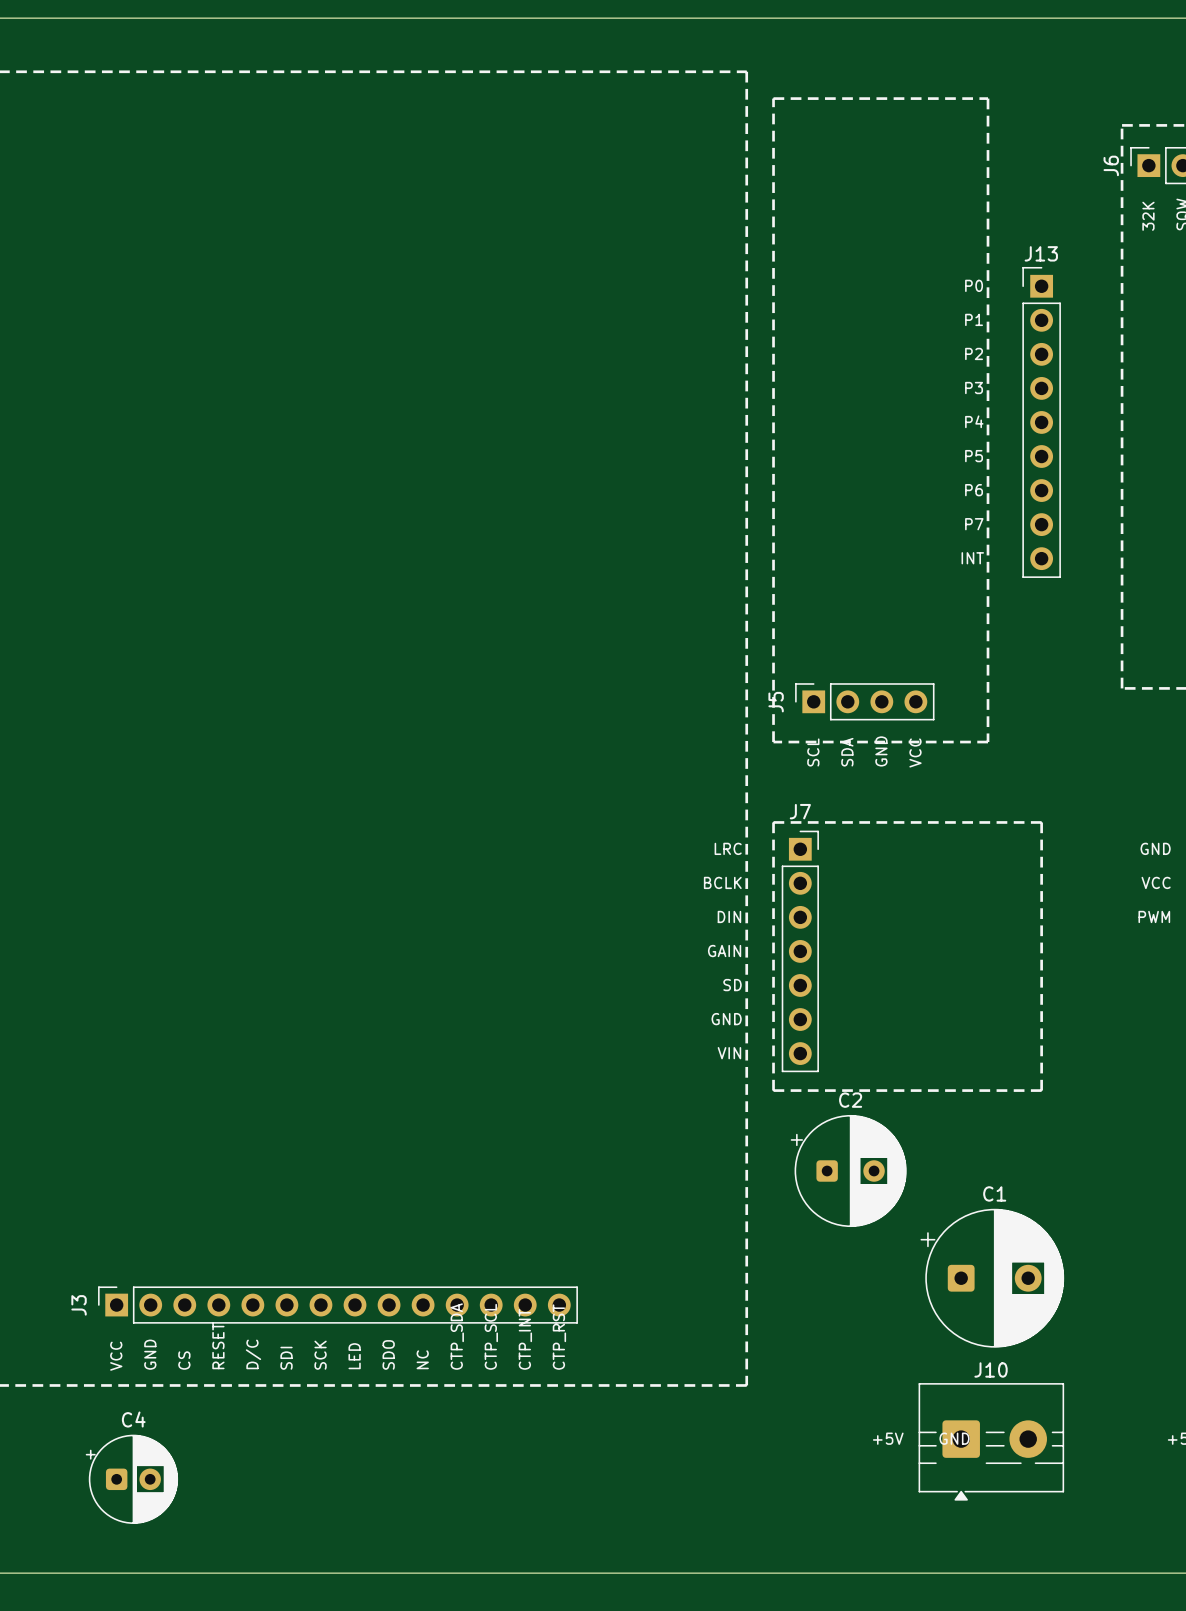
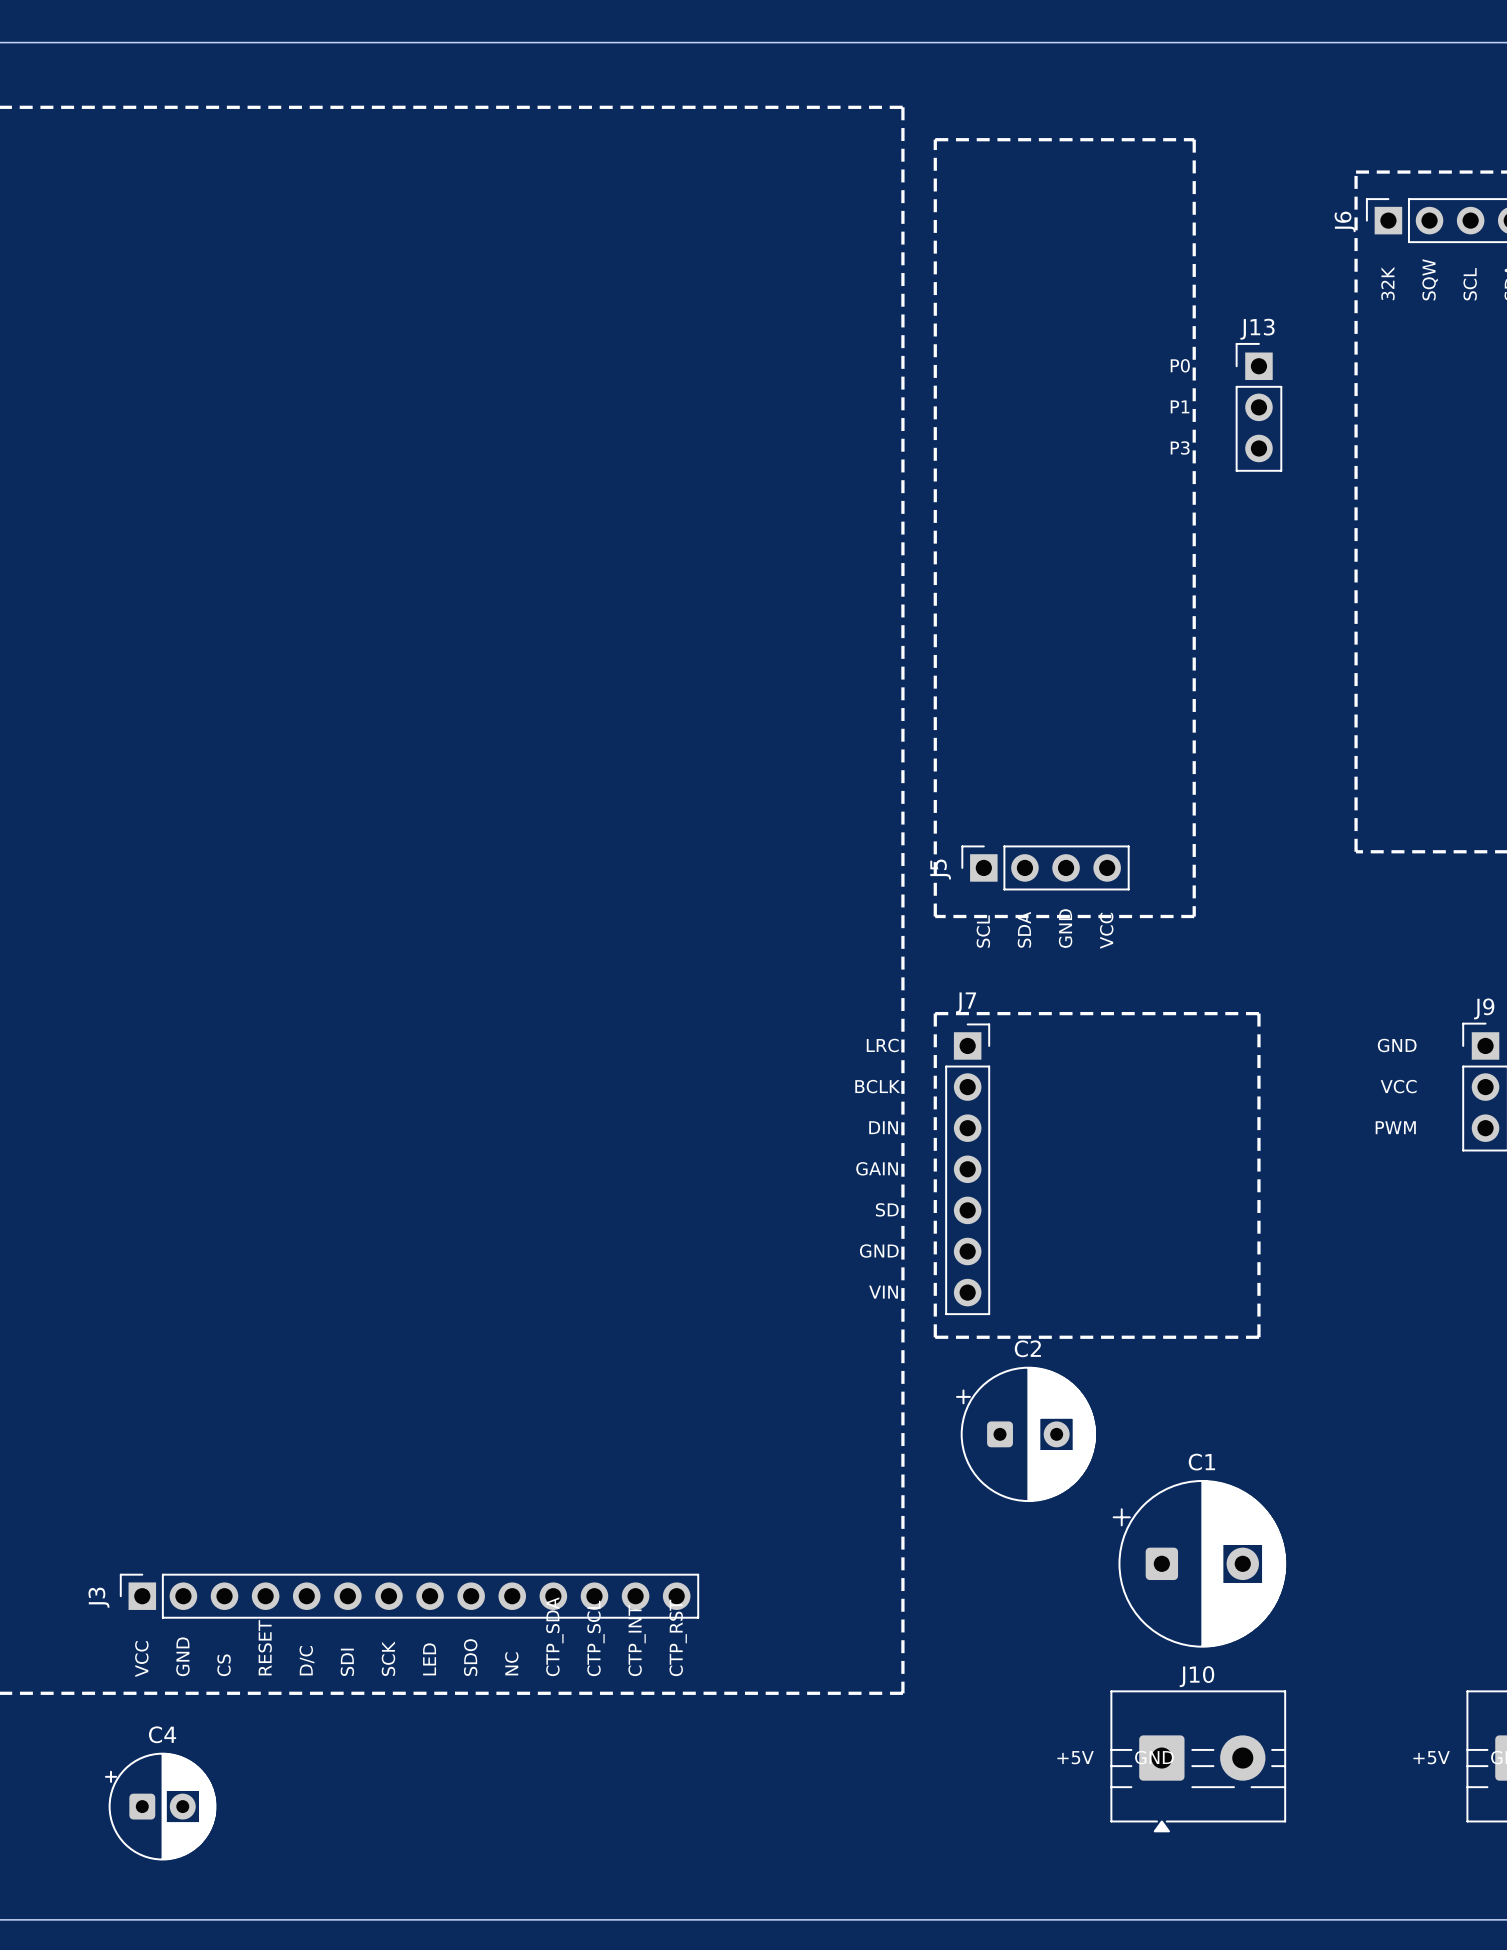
J13 footprint: [1022, 266, 1061, 578] -> [1235, 342, 1283, 472]
text: P2 (974, 353) -> P3 (1180, 448)
text: P3 (974, 388) -> none
text: P4 (974, 421) -> none
text: P5 (974, 456) -> none
text: P6 (974, 490) -> none
text: P7 (974, 524) -> none
text: INT (972, 558) -> none

